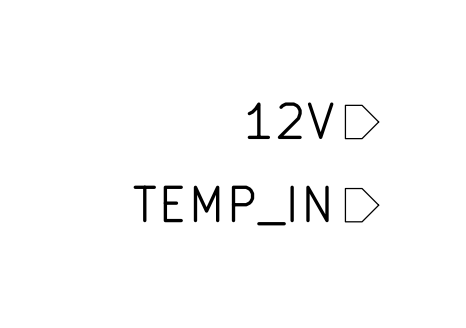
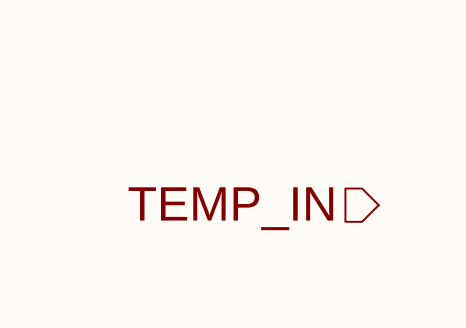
hierarchical label: 12V (290, 120) -> none

